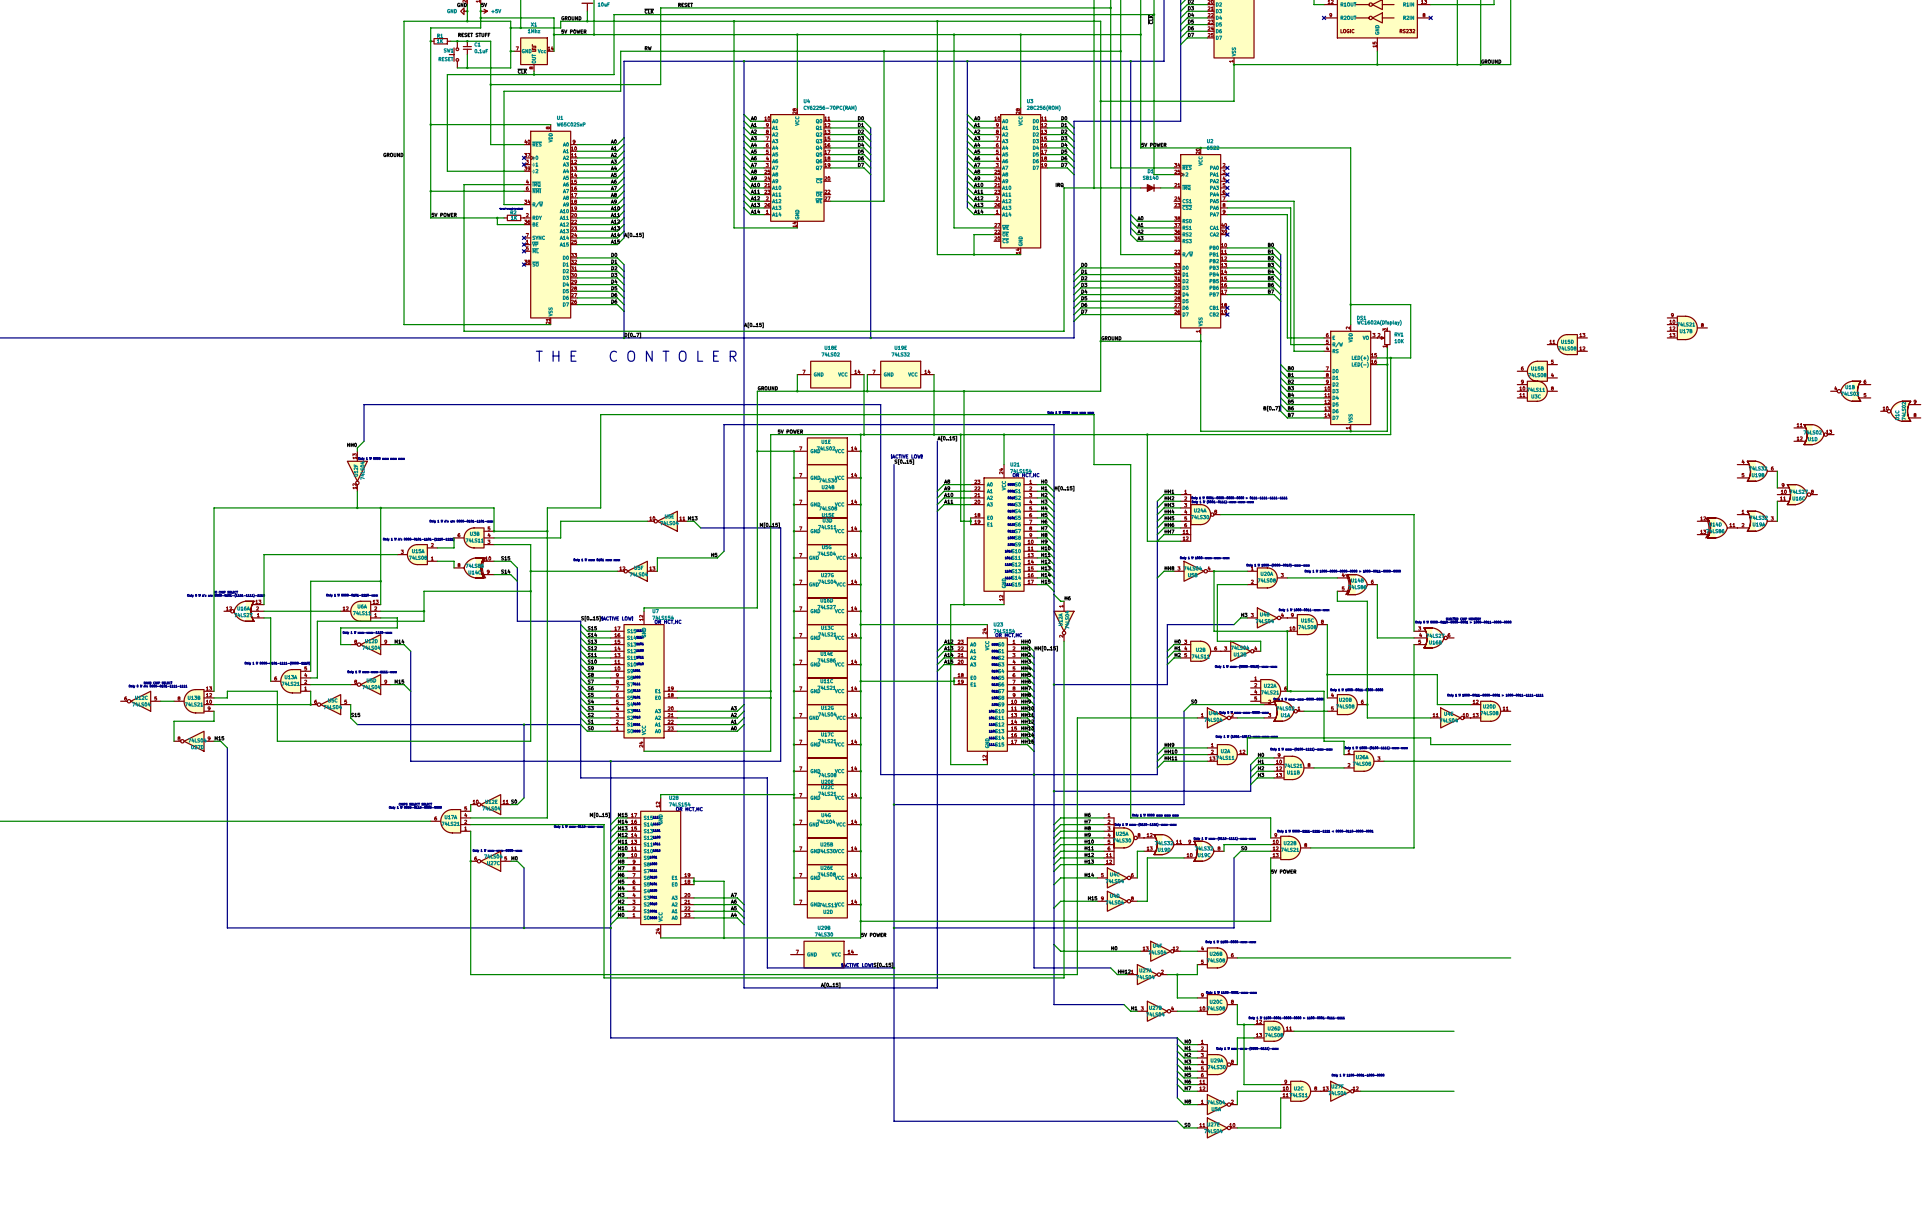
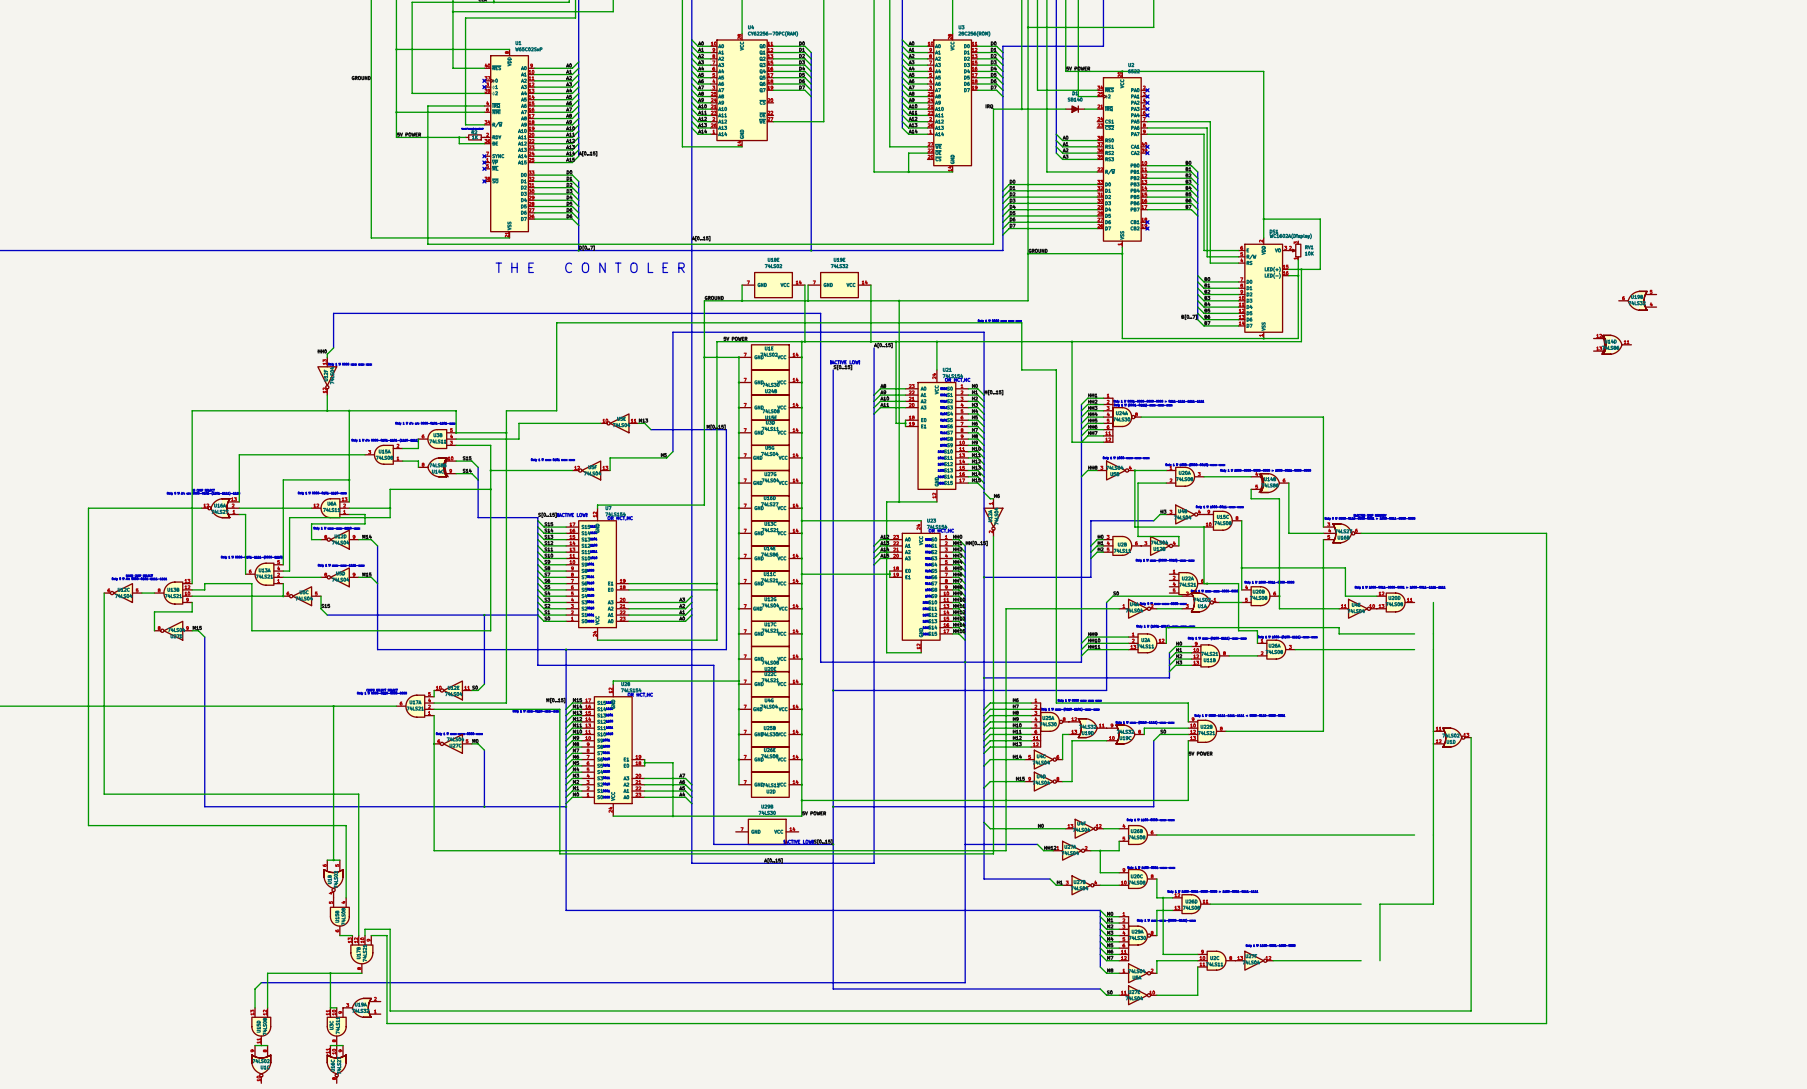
part rotation: 0° (1687, 327) -> 90° clockwise (361, 954)
part position: (1687, 327) -> (361, 954)
part rotation: 0° (1567, 344) -> 90° counterclockwise (261, 1026)
part position: (1567, 344) -> (261, 1026)
part rotation: 0° (1537, 371) -> 90° counterclockwise (339, 916)
part position: (1537, 371) -> (339, 916)
part rotation: 0° (1537, 391) -> 90° clockwise (336, 1026)
part position: (1537, 391) -> (336, 1026)
part rotation: 0° (1850, 391) -> 90° counterclockwise (333, 879)
part position: (1850, 391) -> (333, 879)
part rotation: 0° (1900, 411) -> 90° counterclockwise (261, 1064)
part position: (1900, 411) -> (261, 1064)
part position: (1814, 434) -> (1452, 737)
part rotation: 0° (1757, 471) -> 180° (1637, 300)
part position: (1757, 471) -> (1637, 300)
wire: (1777, 471) (1777, 487) -> none
part rotation: 0° (1797, 494) -> 90° clockwise (336, 1064)
part position: (1797, 494) -> (336, 1064)
wire: (1777, 501) (1777, 521) -> none
part rotation: 0° (1757, 521) -> 180° (361, 1007)
part position: (1757, 521) -> (361, 1007)
part position: (1717, 527) -> (1612, 344)
wire: none -> (201, 508) (88, 508) (88, 825) (346, 825) (346, 897)
wire: none -> (1361, 533) (1546, 533) (1546, 1023) (387, 1023) (387, 935) (371, 935)
wire: none -> (104, 593) (104, 794) (358, 794) (358, 935)
wire: none -> (1433, 602) (1433, 904) (1379, 904) (1379, 960)
wire: none -> (333, 706) (333, 860)
wire: none -> (1471, 737) (1471, 1010) (390, 1010) (390, 929) (365, 929) (365, 935)
bus: none -> (965, 844) (965, 982) (261, 982)
wire: none -> (327, 860) (339, 860)
wire: none -> (339, 935) (352, 935)
wire: none -> (330, 973) (330, 1007) (336, 1007)
wire: none -> (361, 973) (267, 973) (267, 1007)
wire: none -> (261, 982) (255, 988) (255, 1007)
wire: none -> (255, 1045) (267, 1045)
wire: none -> (330, 1045) (343, 1045)

